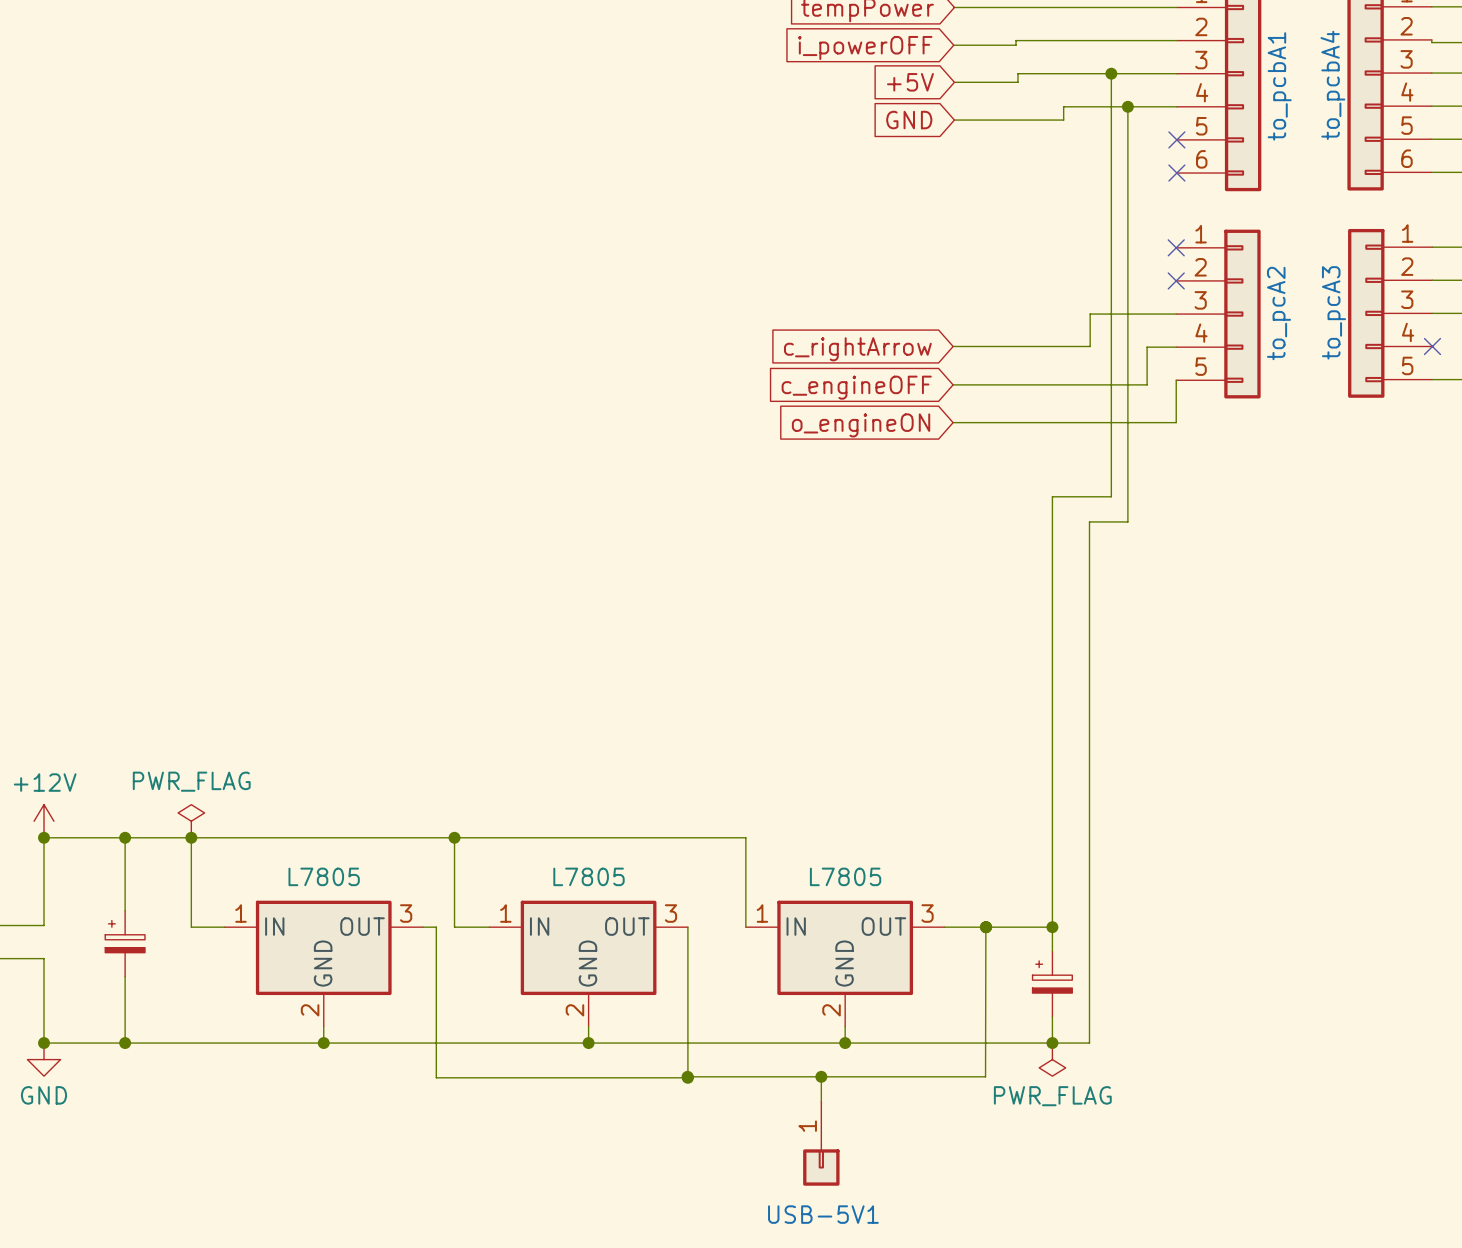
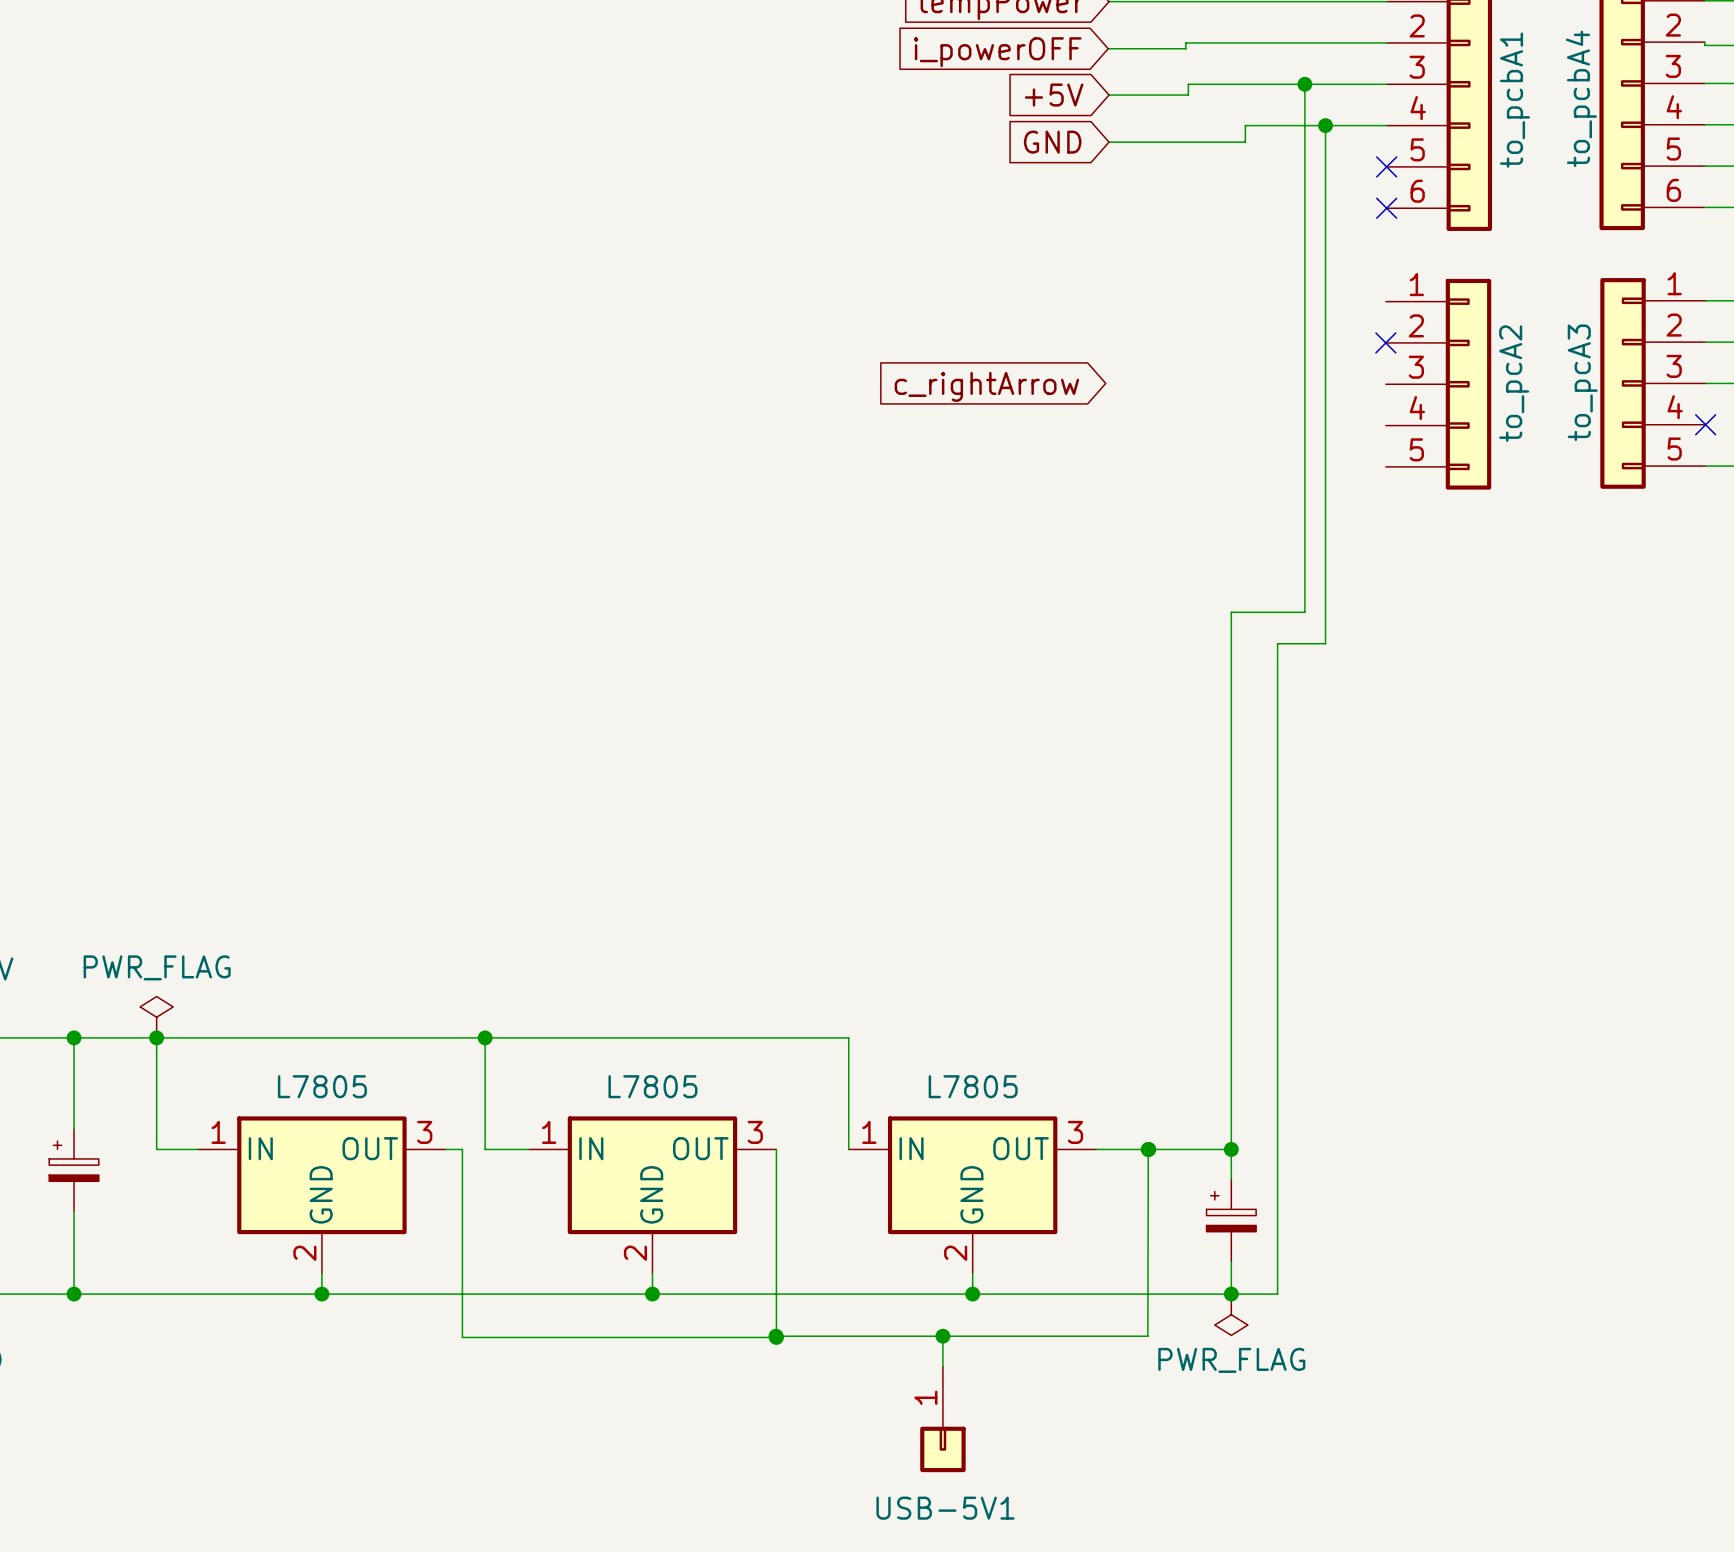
no-connect mark: (1176, 247) -> none
wire: (1176, 314) (1090, 314) (1090, 346) (953, 346) -> none
wire: (1176, 347) (1147, 347) (1147, 384) (953, 384) -> none
global label position: c_rightArrow (857, 349) -> c_rightArrow (986, 386)
wire: (1176, 380) (1176, 422) (953, 422) -> none
global label: c_engineOFF (856, 387) -> none
global label: o_engineON (861, 425) -> none

